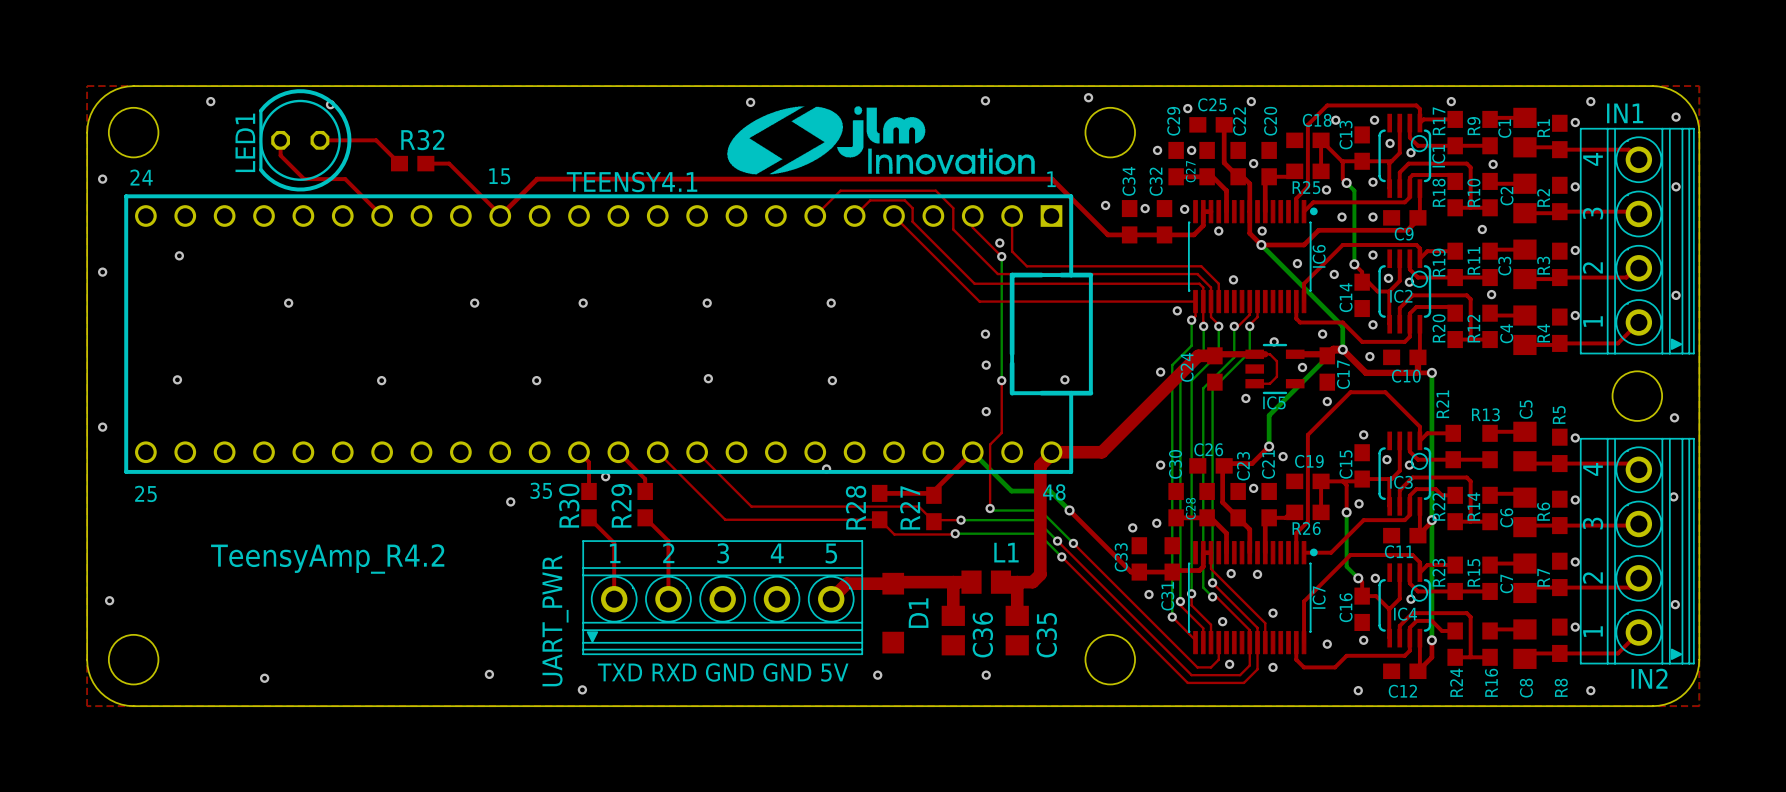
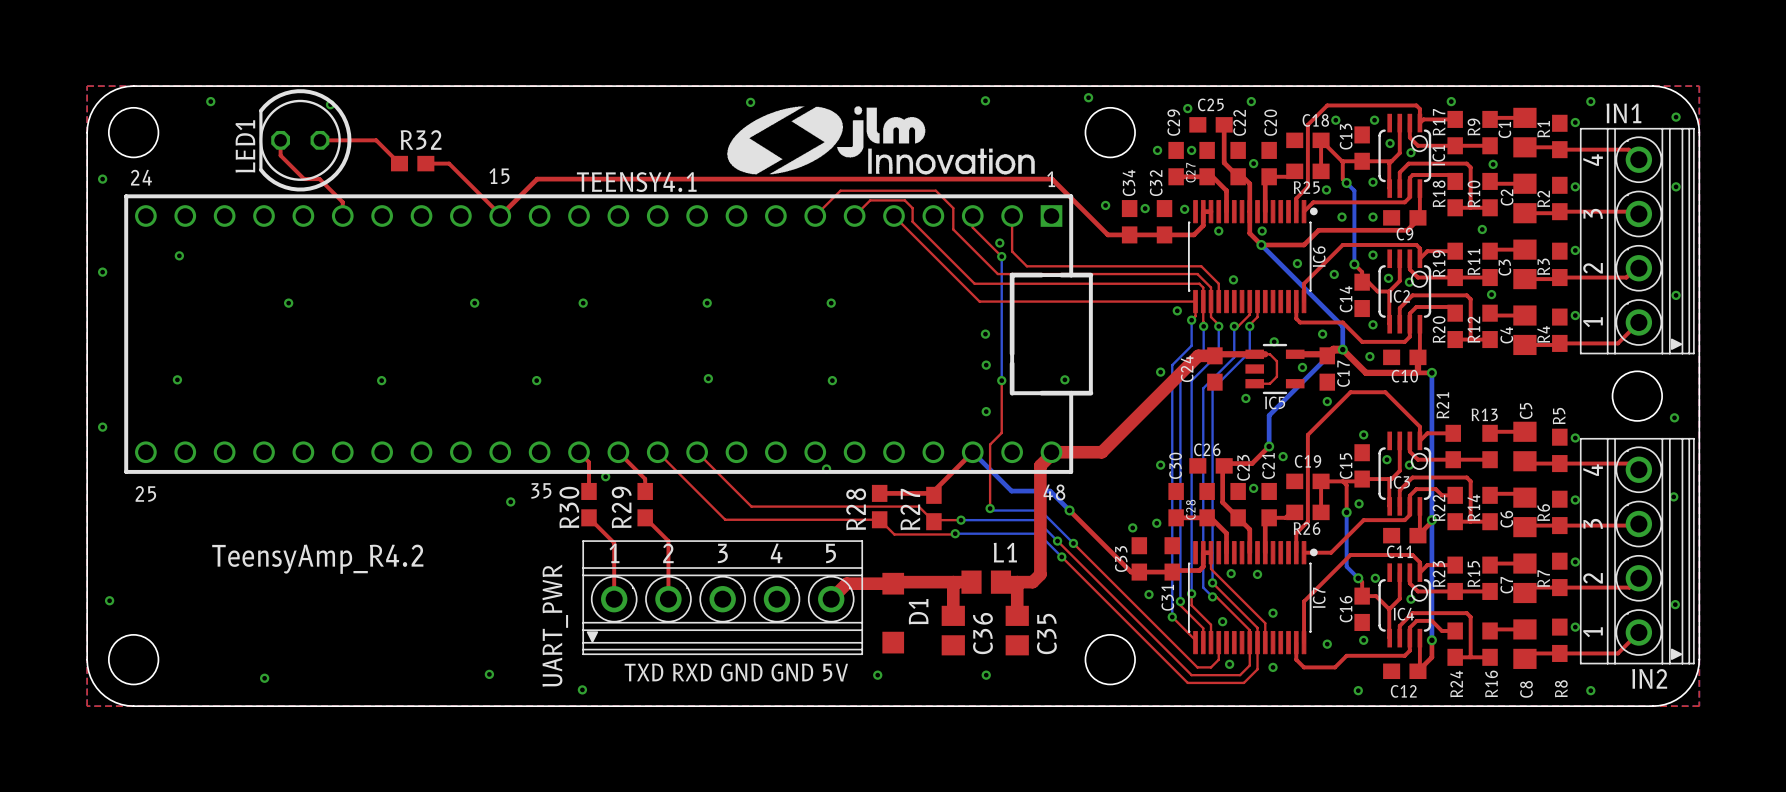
top track: (319, 179) (345, 179) (382, 216) -> (319, 179) (342, 202) (342, 216)

